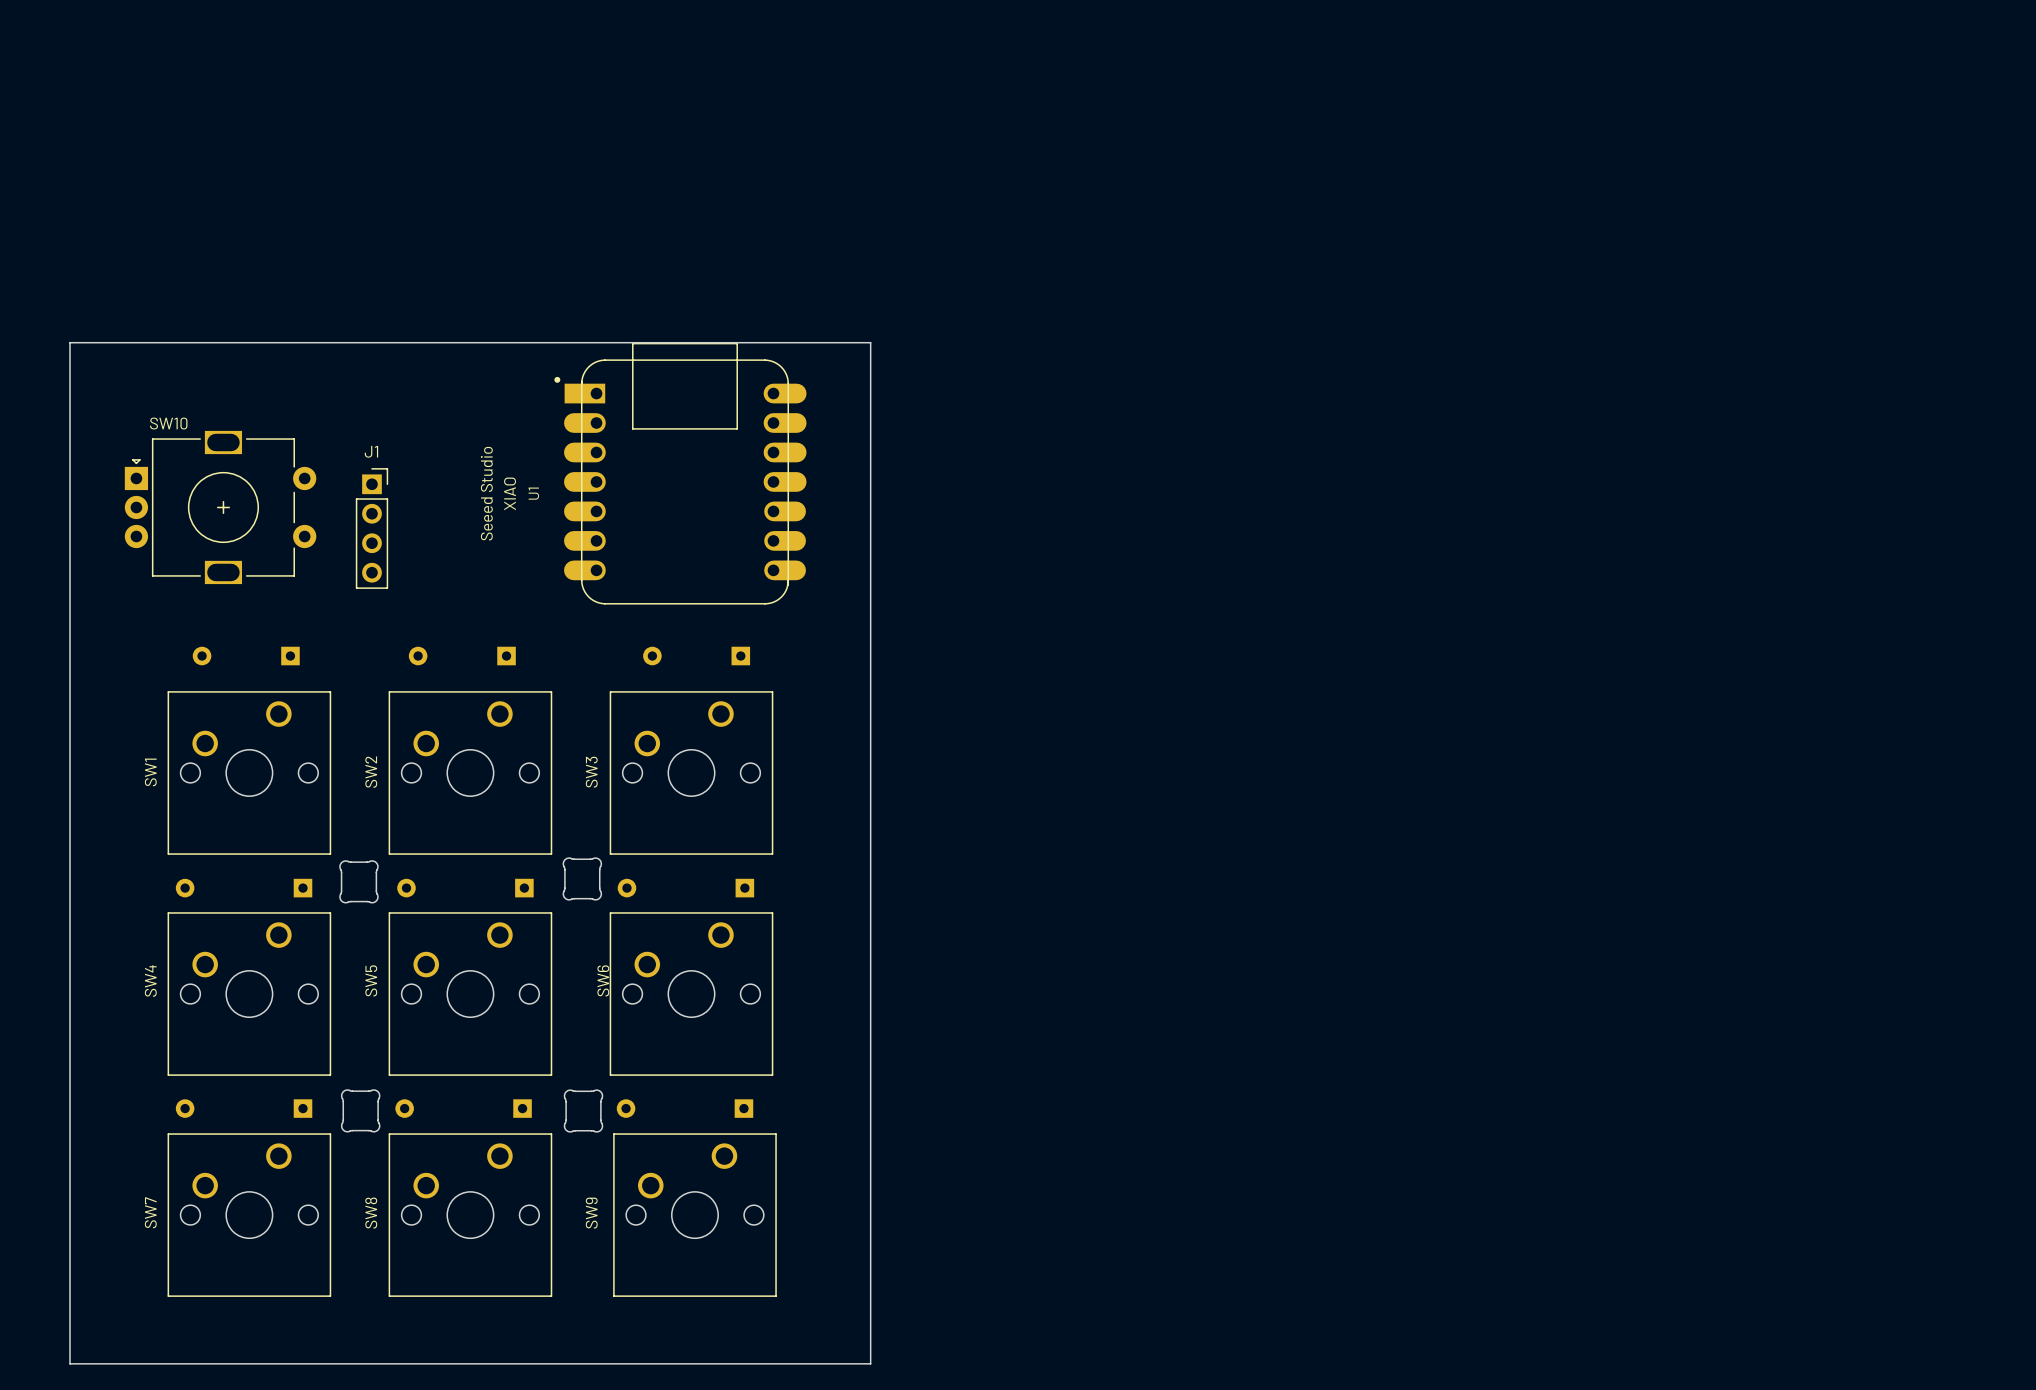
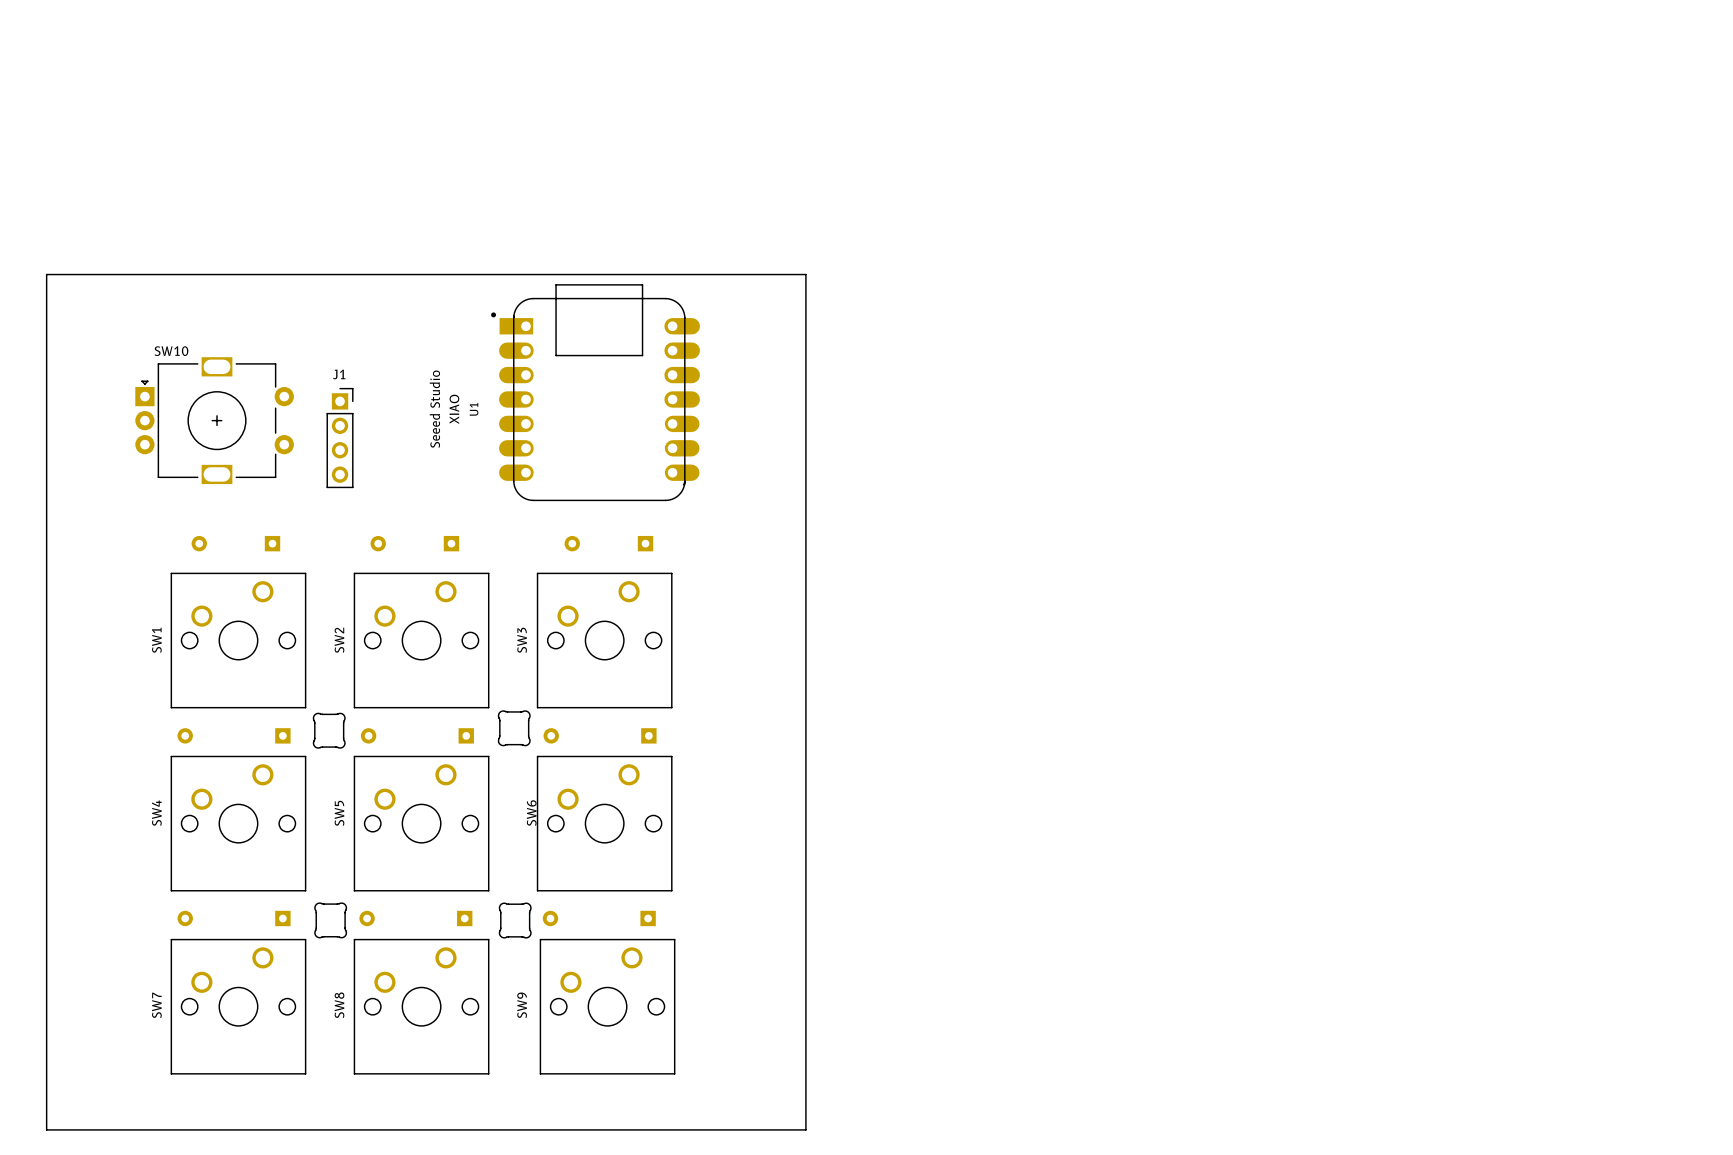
board edge: (69, 1363) (69, 342) (870, 342) (870, 1363) -> (89, 1129) (46, 1129) (46, 274) (805, 274) (805, 1129) (753, 1129)

